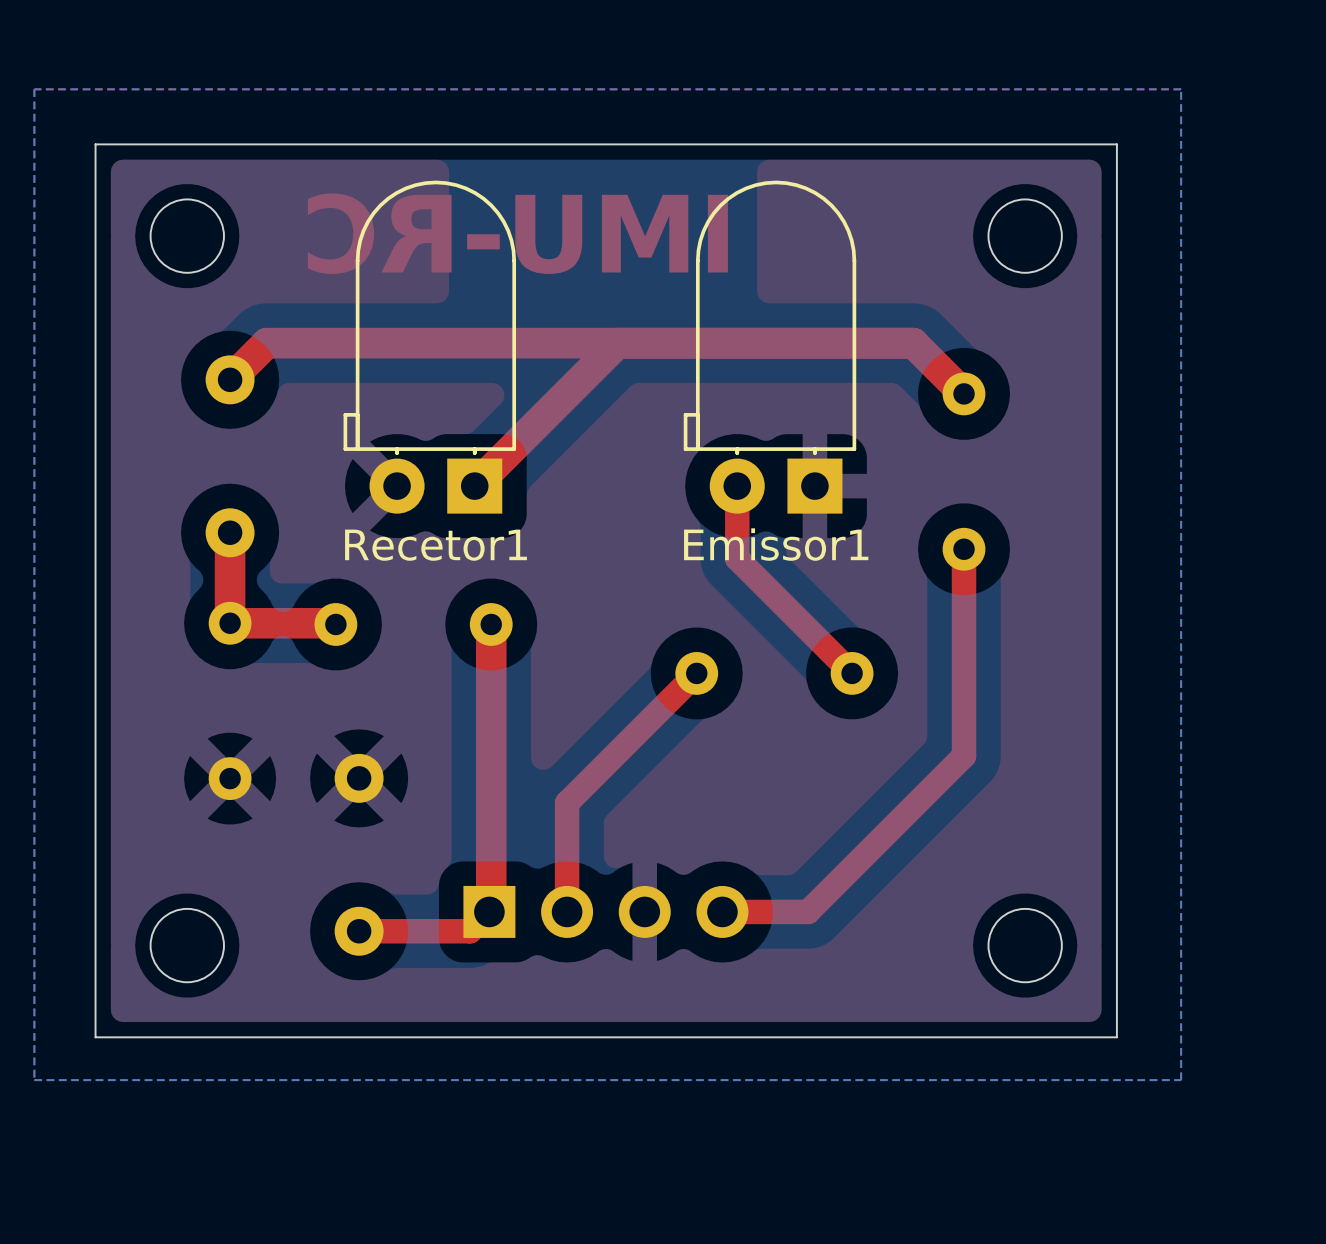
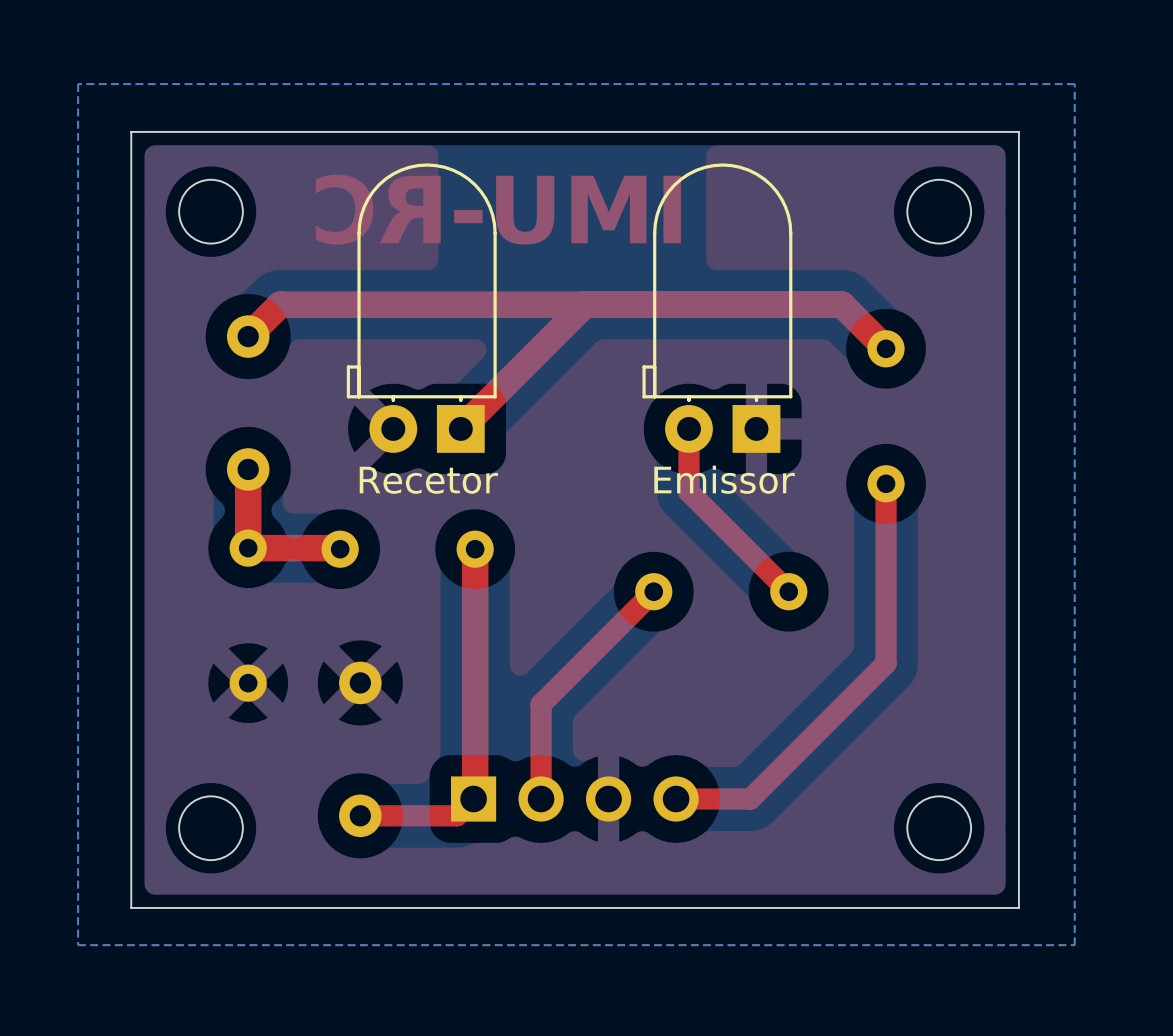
Emissor1 name: Emissor1 (776, 544) -> Emissor (724, 479)
Recetor1 name: Recetor1 (436, 545) -> Recetor (428, 480)

